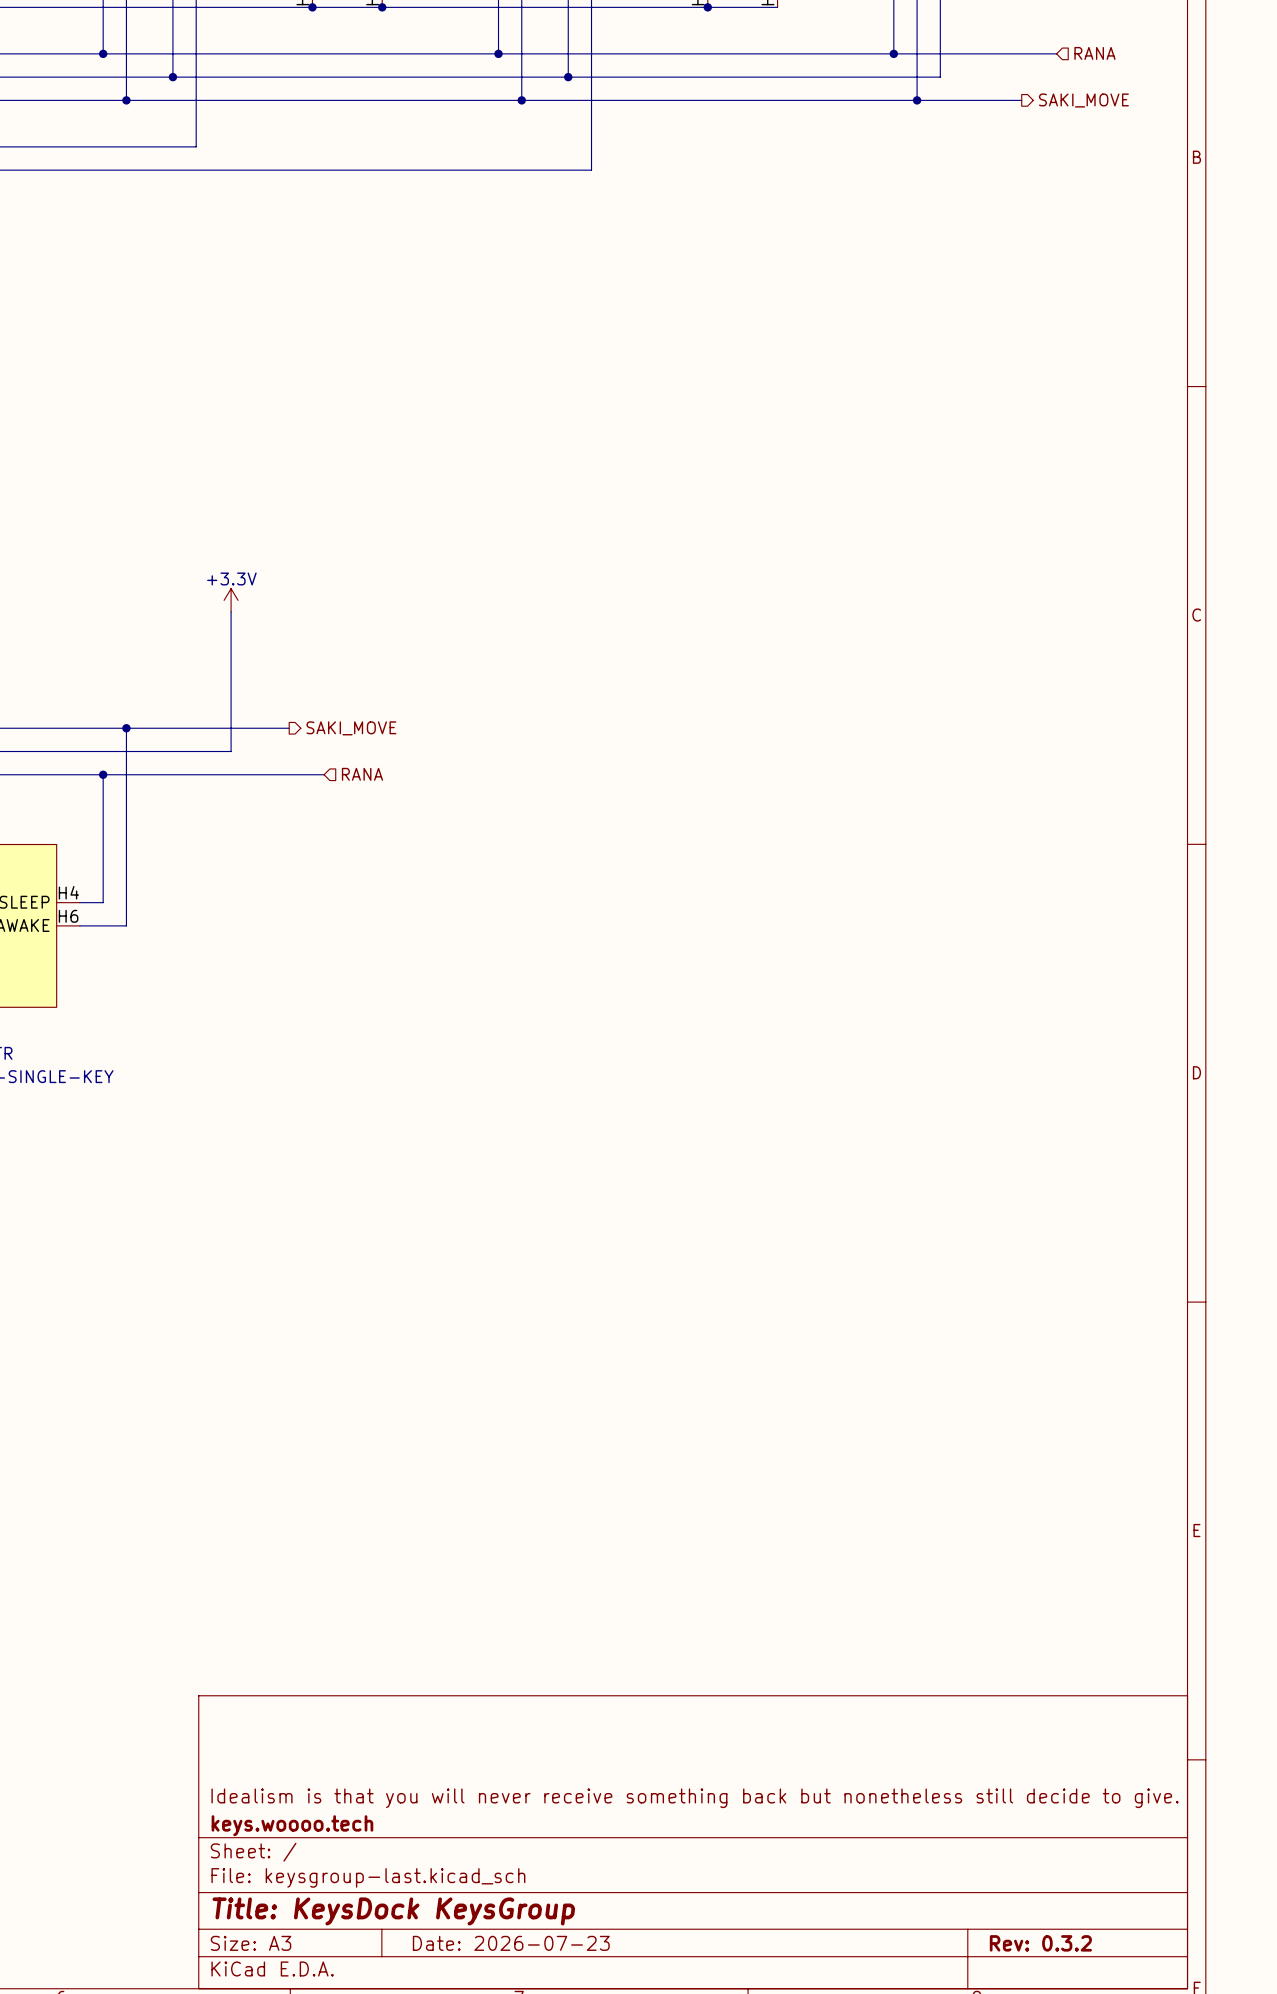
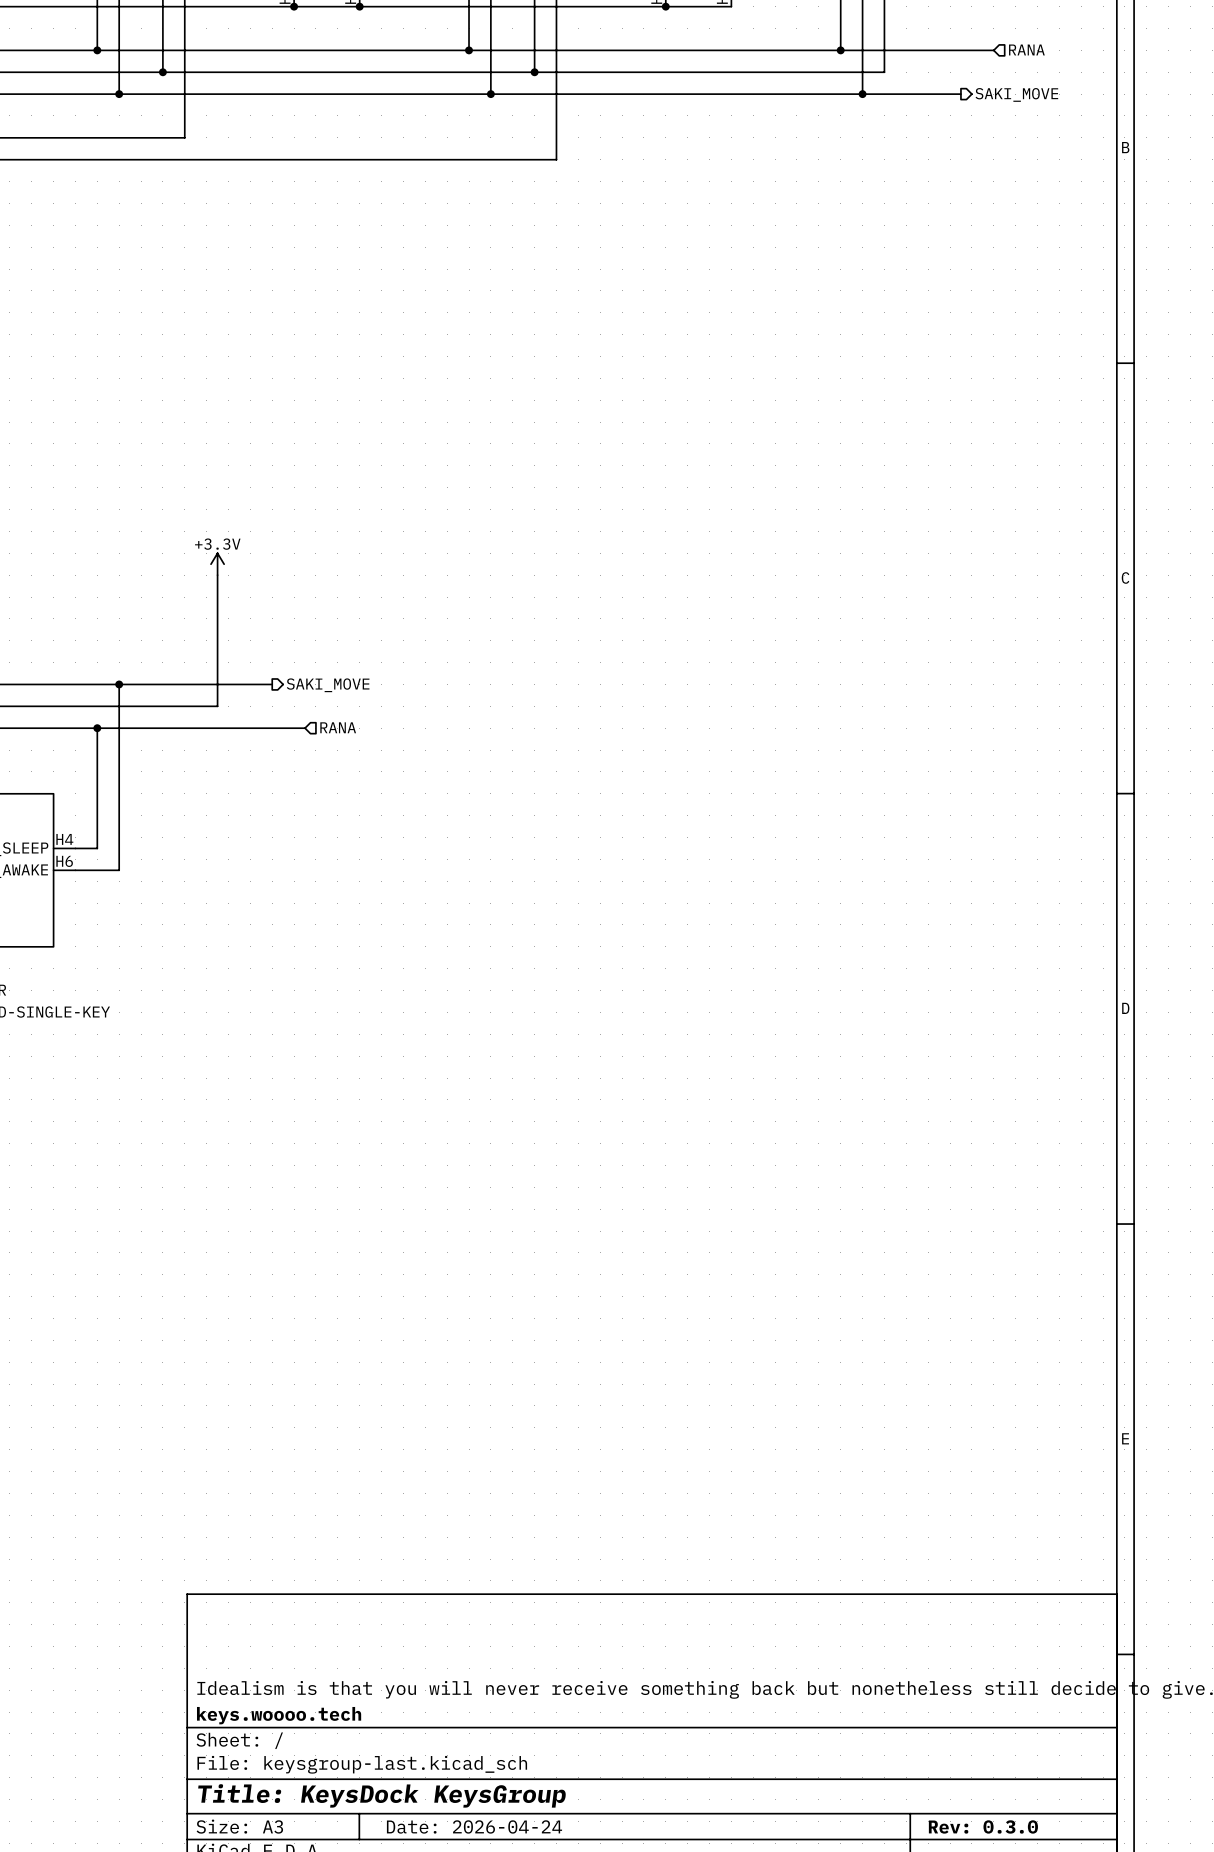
title block: Date: 2026-07-23 (511, 1943) -> Date: 2026-04-24 (474, 1826)
title block: Rev: 0.3.2 (1040, 1943) -> Rev: 0.3.0 (983, 1826)

